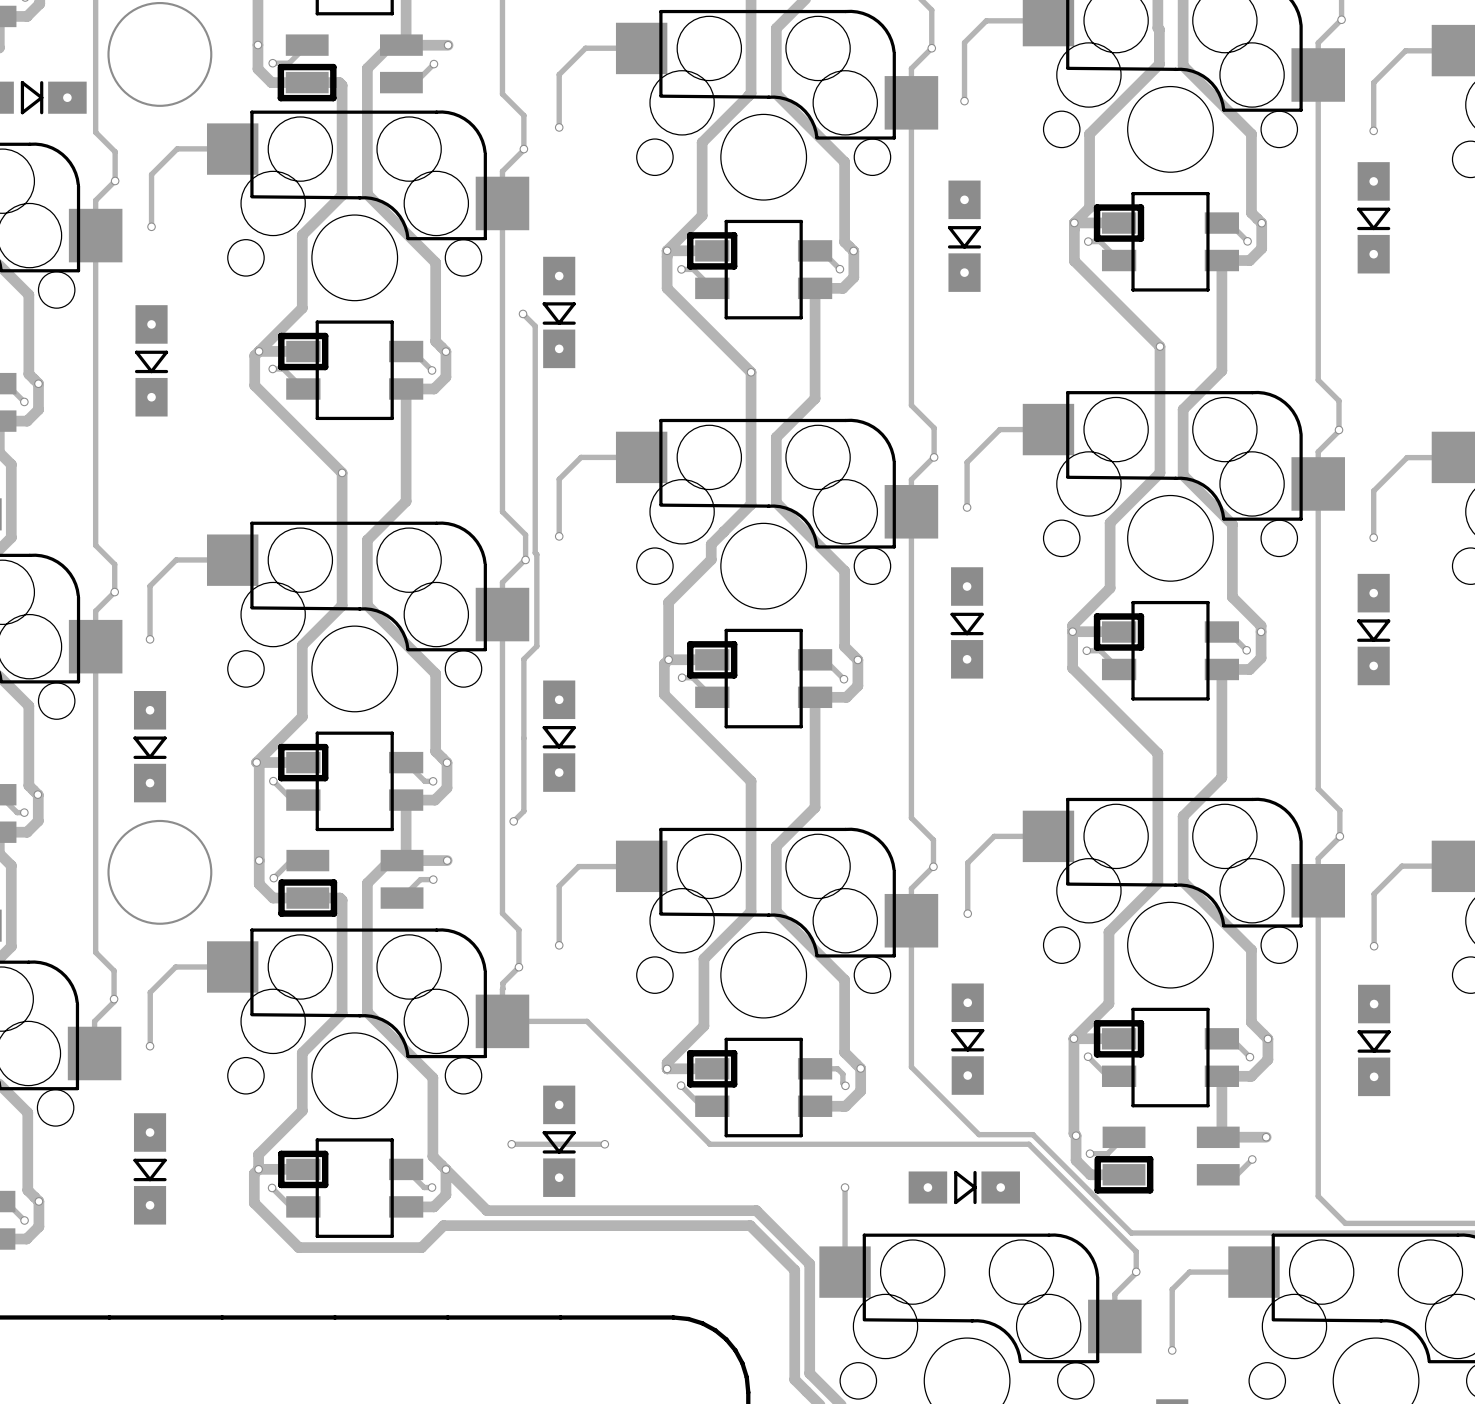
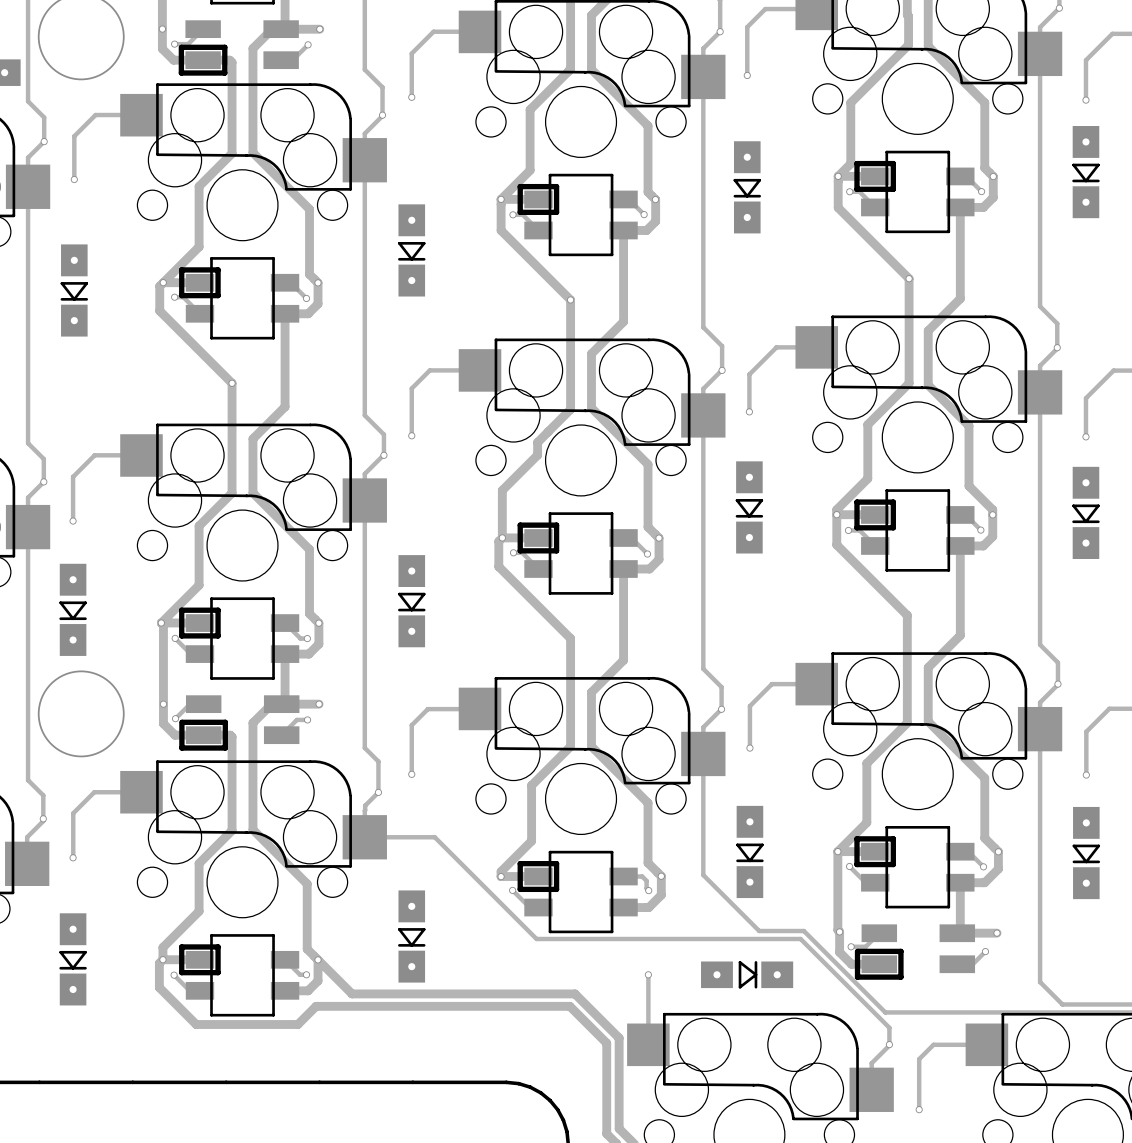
track: (523, 313) (535, 326) (536, 646) (523, 659) (523, 811) (513, 821) -> none
via: (523, 313) -> none
via: (513, 821) -> none
via: (511, 1144) -> none
track: (604, 1144) (511, 1144) -> none
via: (604, 1144) -> none

